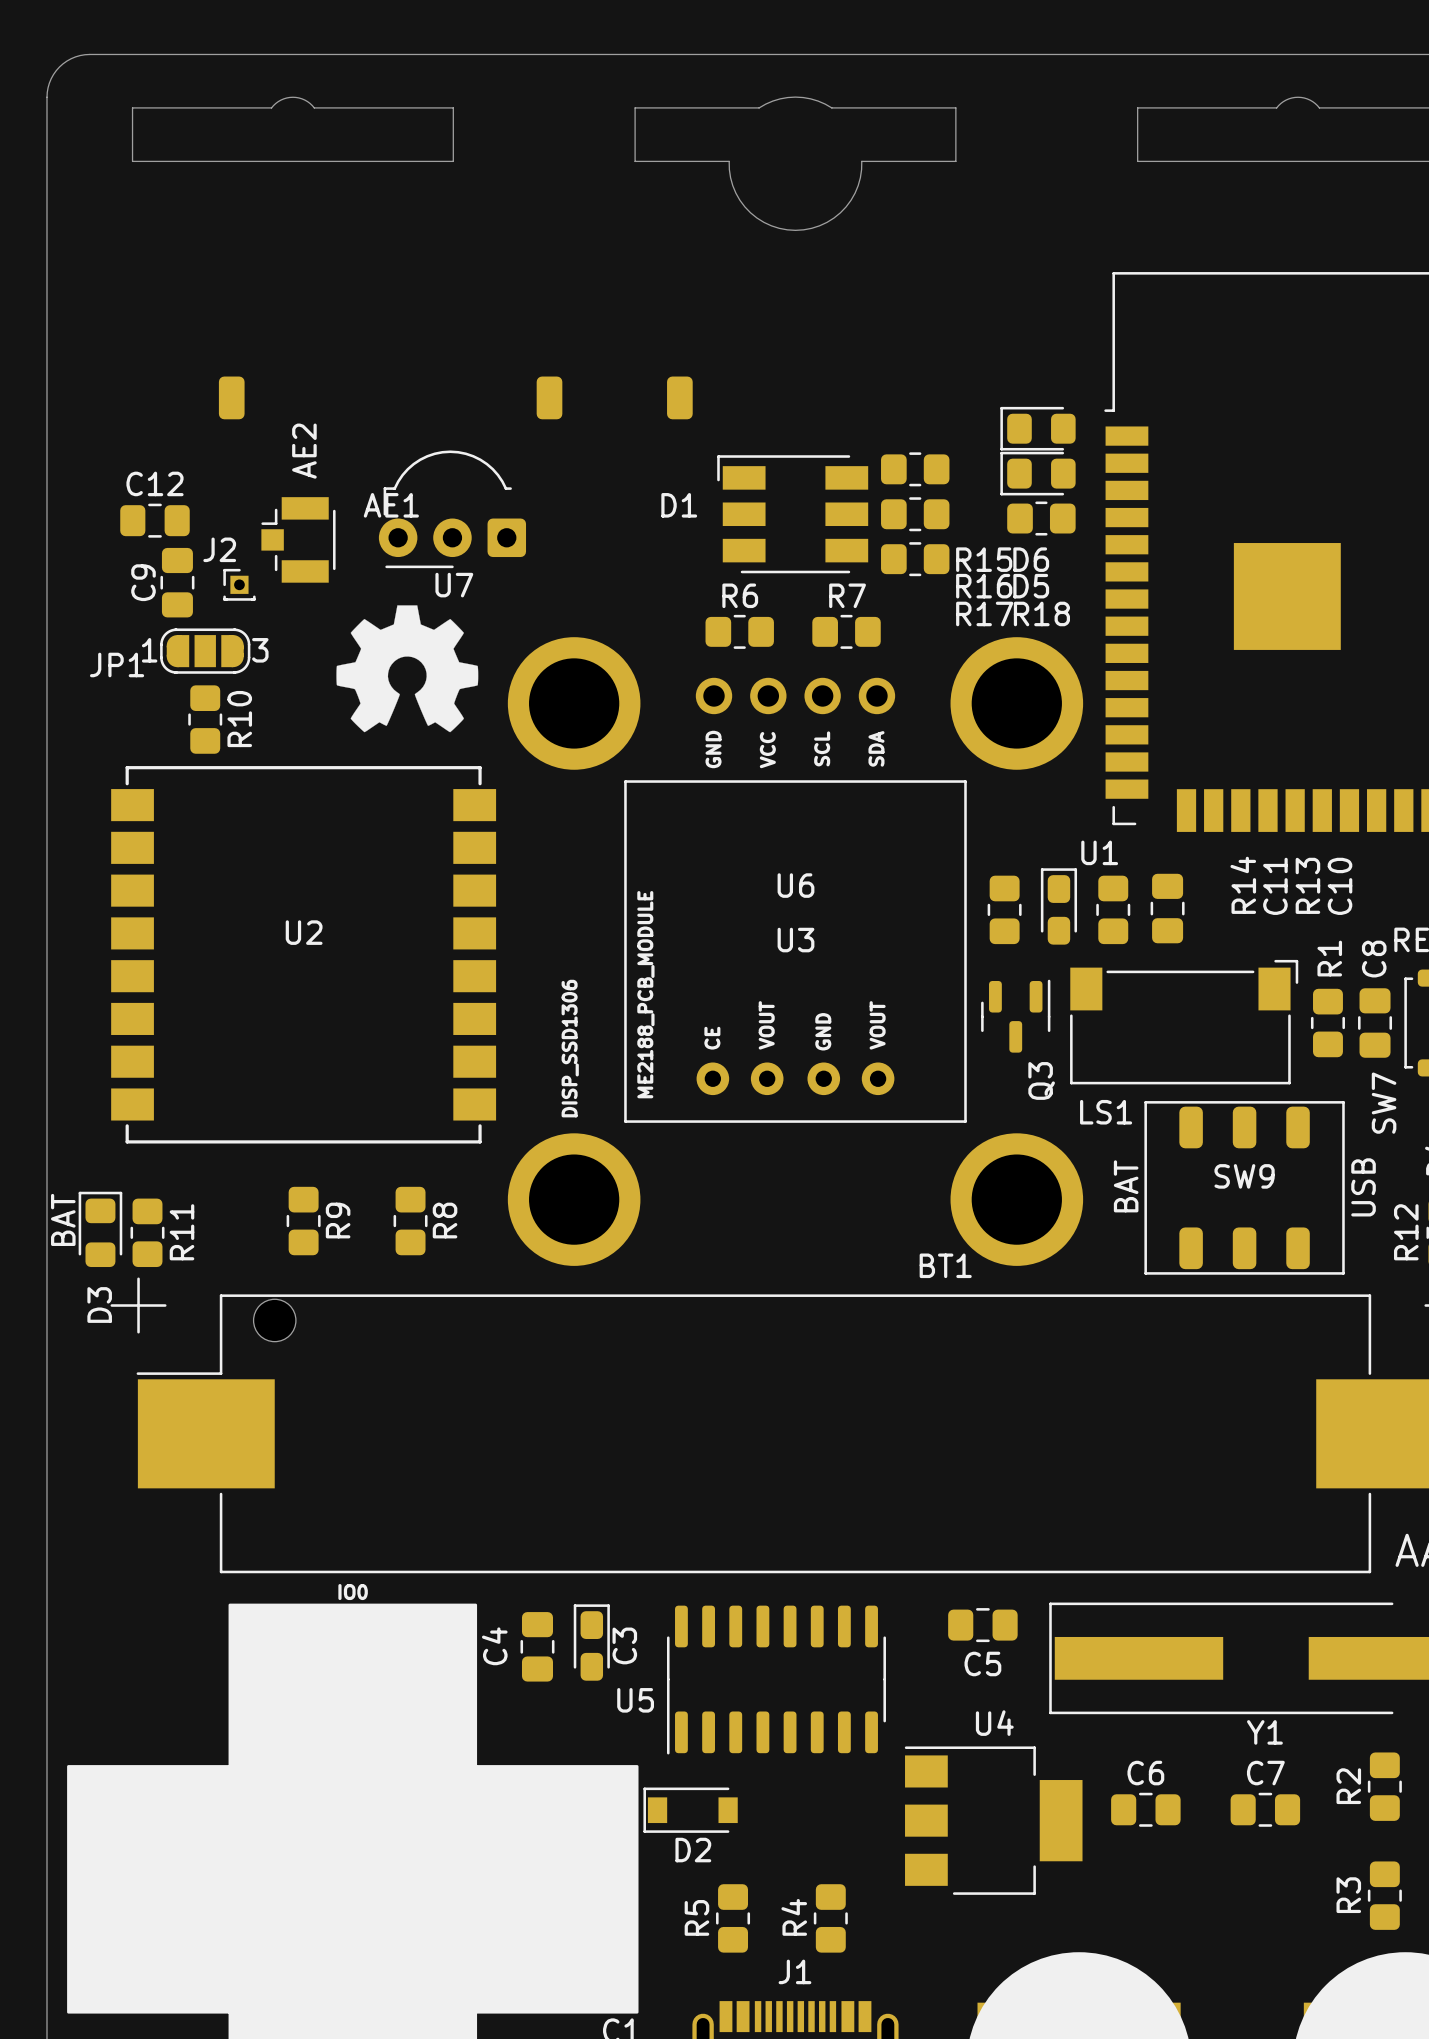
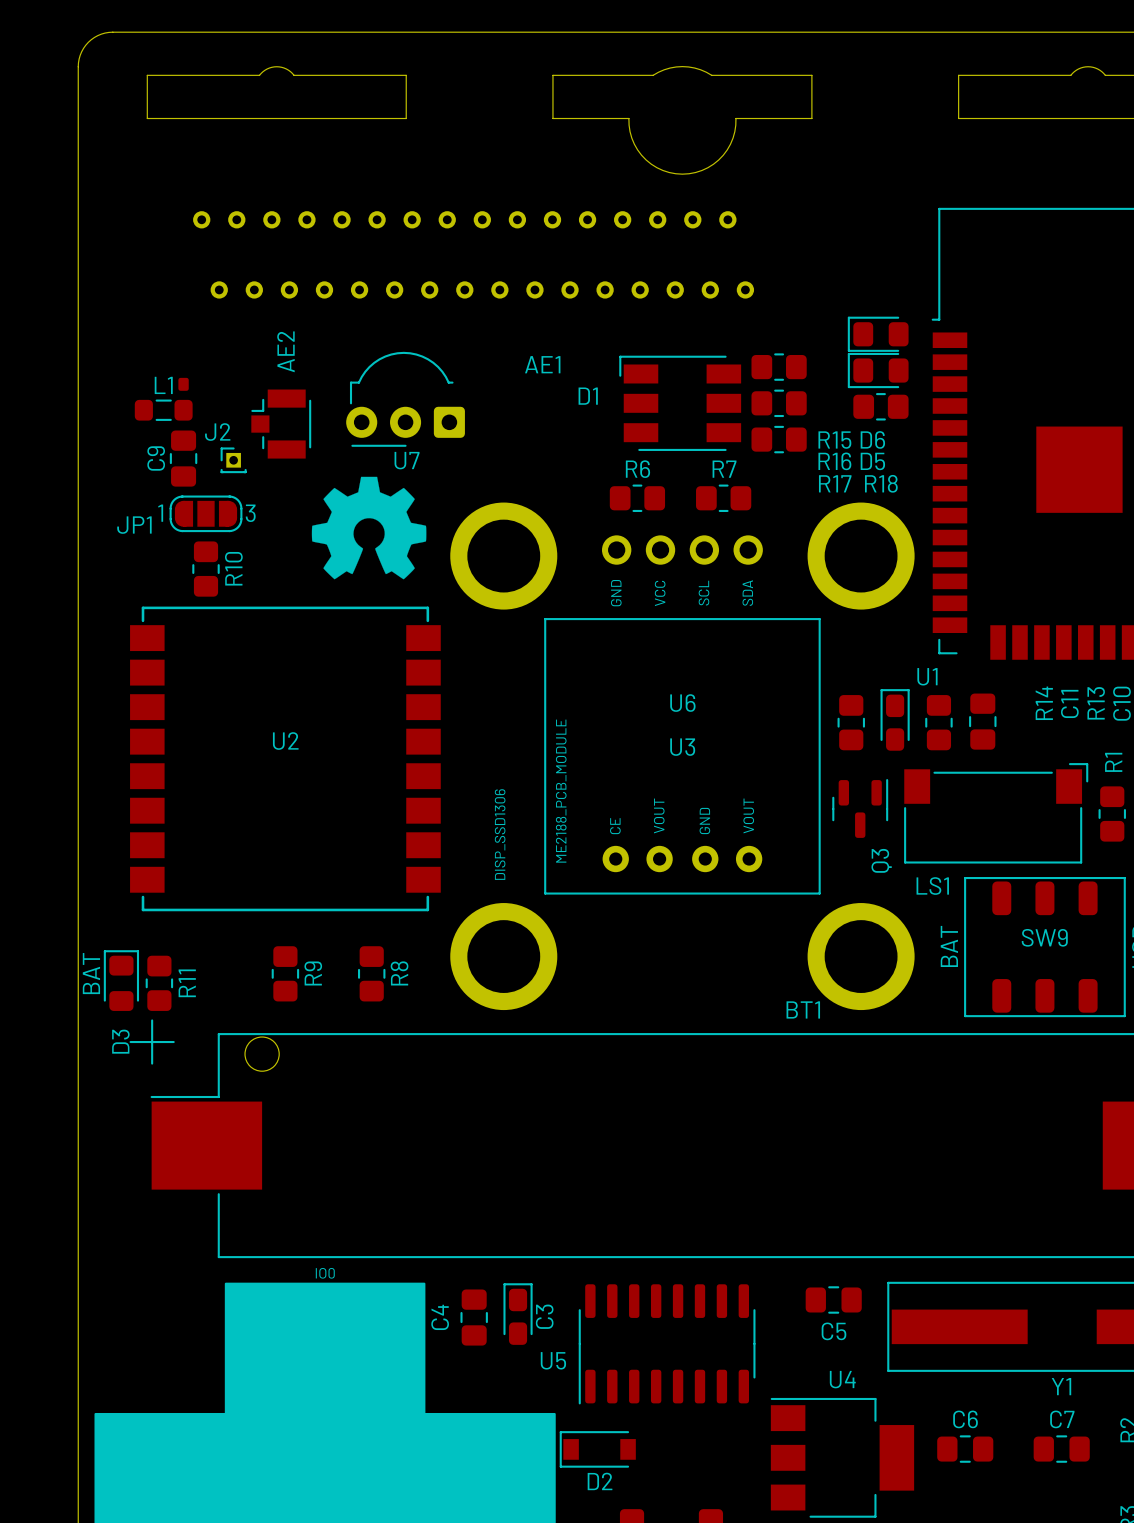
AE1 footprint: [218, 376, 693, 420] -> [178, 211, 755, 391]
AE1 name position: AE1 (391, 505) -> AE1 (542, 364)
C12: (154, 520) -> none
L1: none -> (163, 410)

